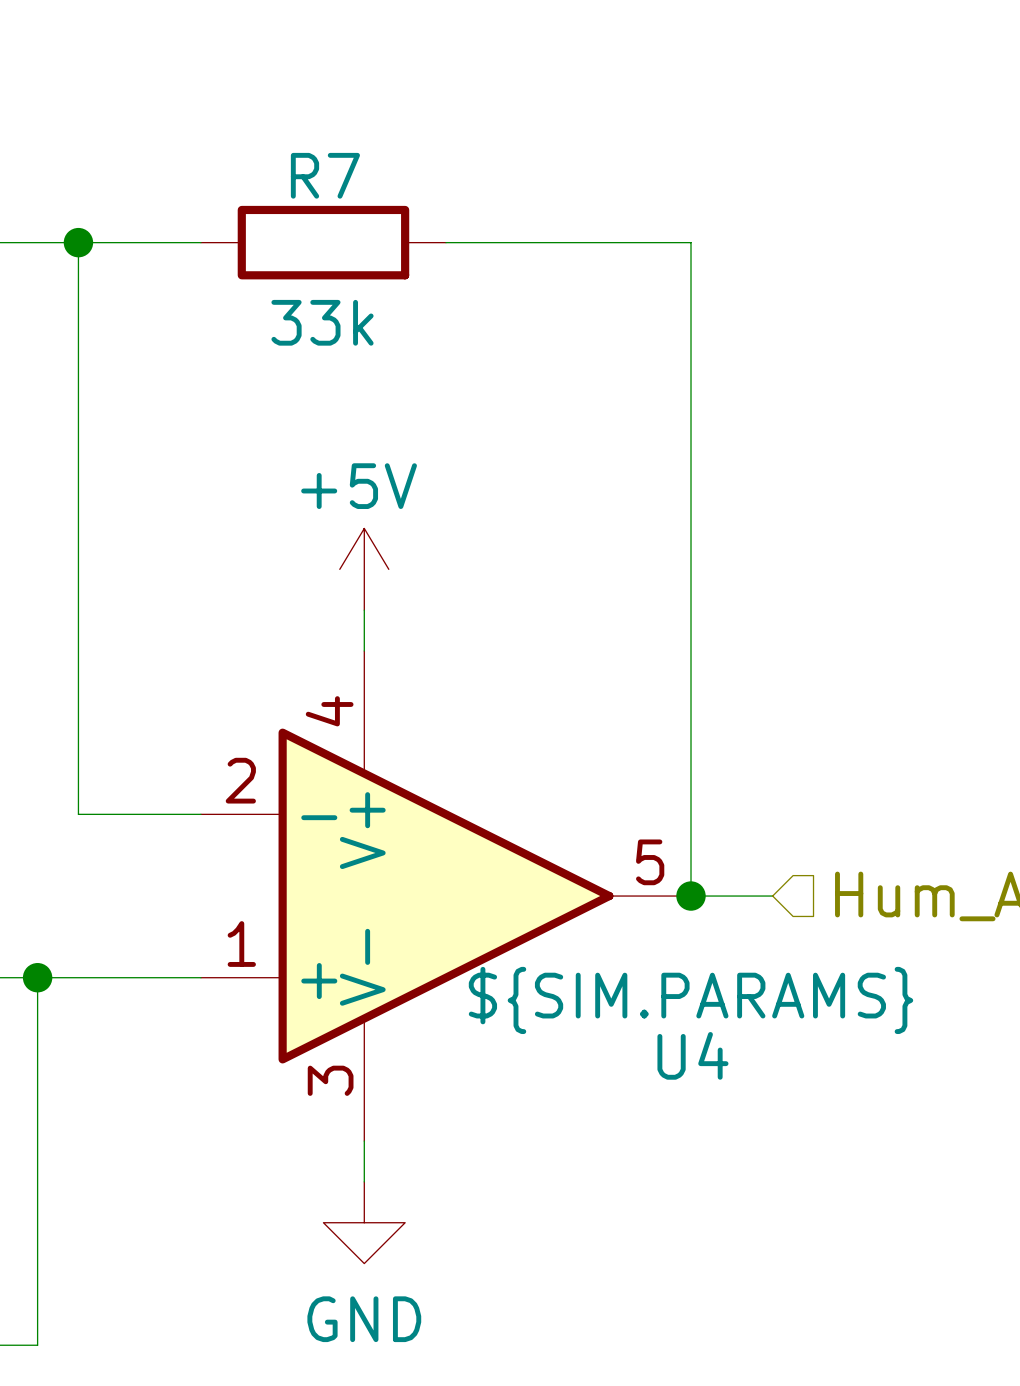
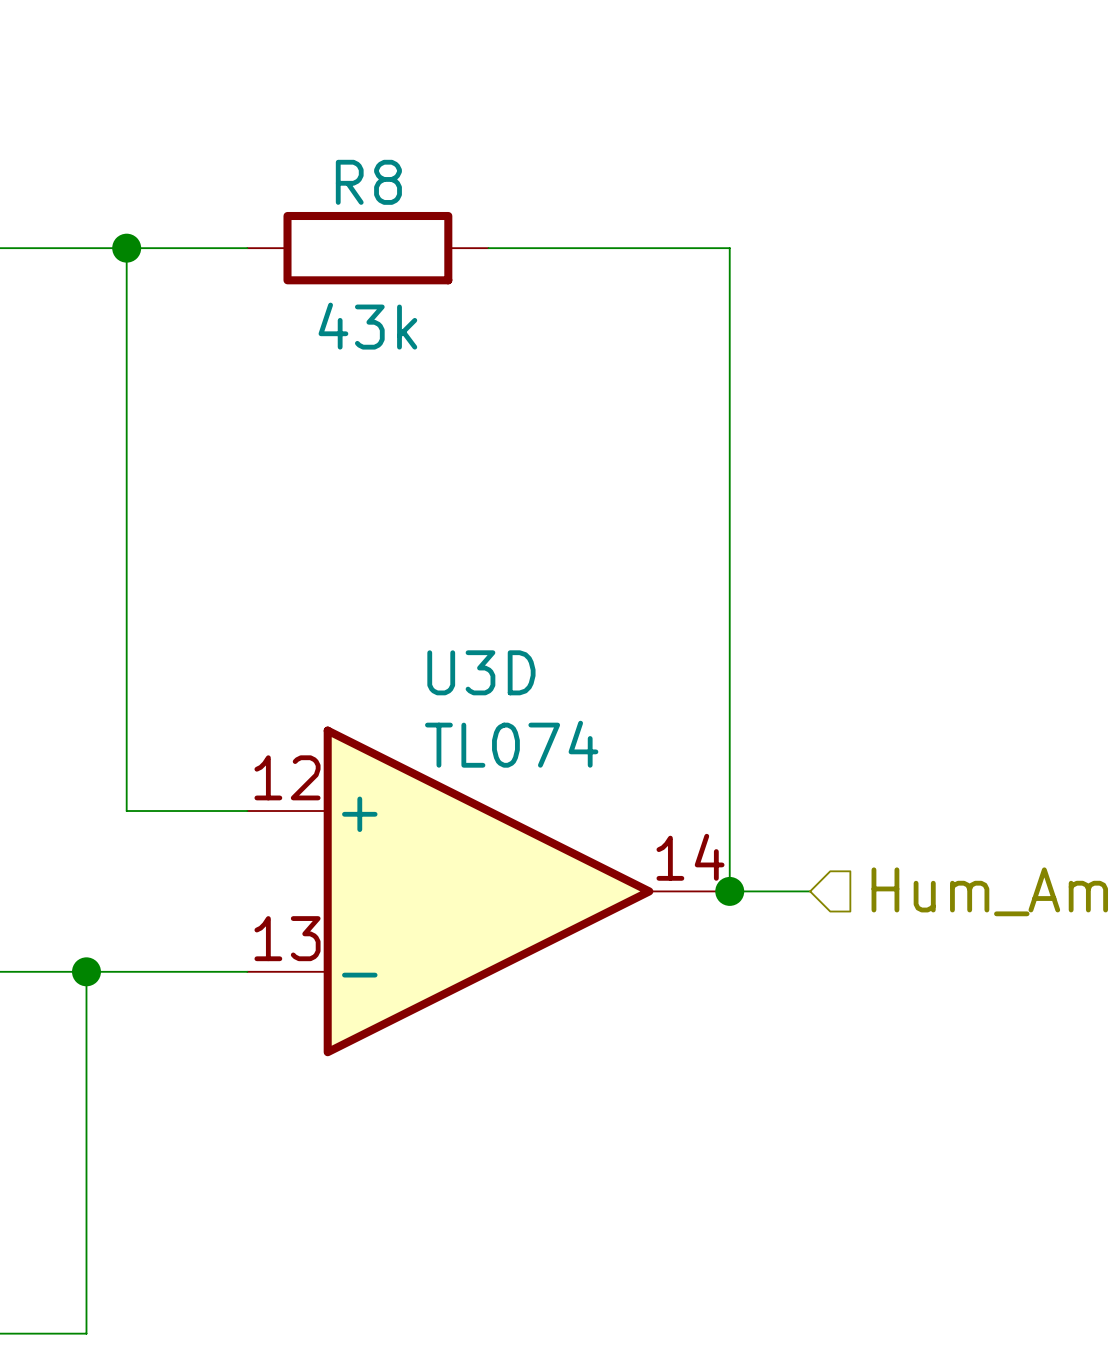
R7 name: R7 (325, 175) -> R8 (368, 182)
R7 value: 33k (322, 322) -> 43k (367, 326)
power symbol: +5V (364, 569) -> none
wire: (364, 610) (364, 651) -> none
U4: ${SIM.PARAMS} (445, 896) -> none
U3D: none -> TL074 (488, 891)
wire: (364, 1141) (364, 1181) -> none
power symbol: GND (364, 1222) -> none

